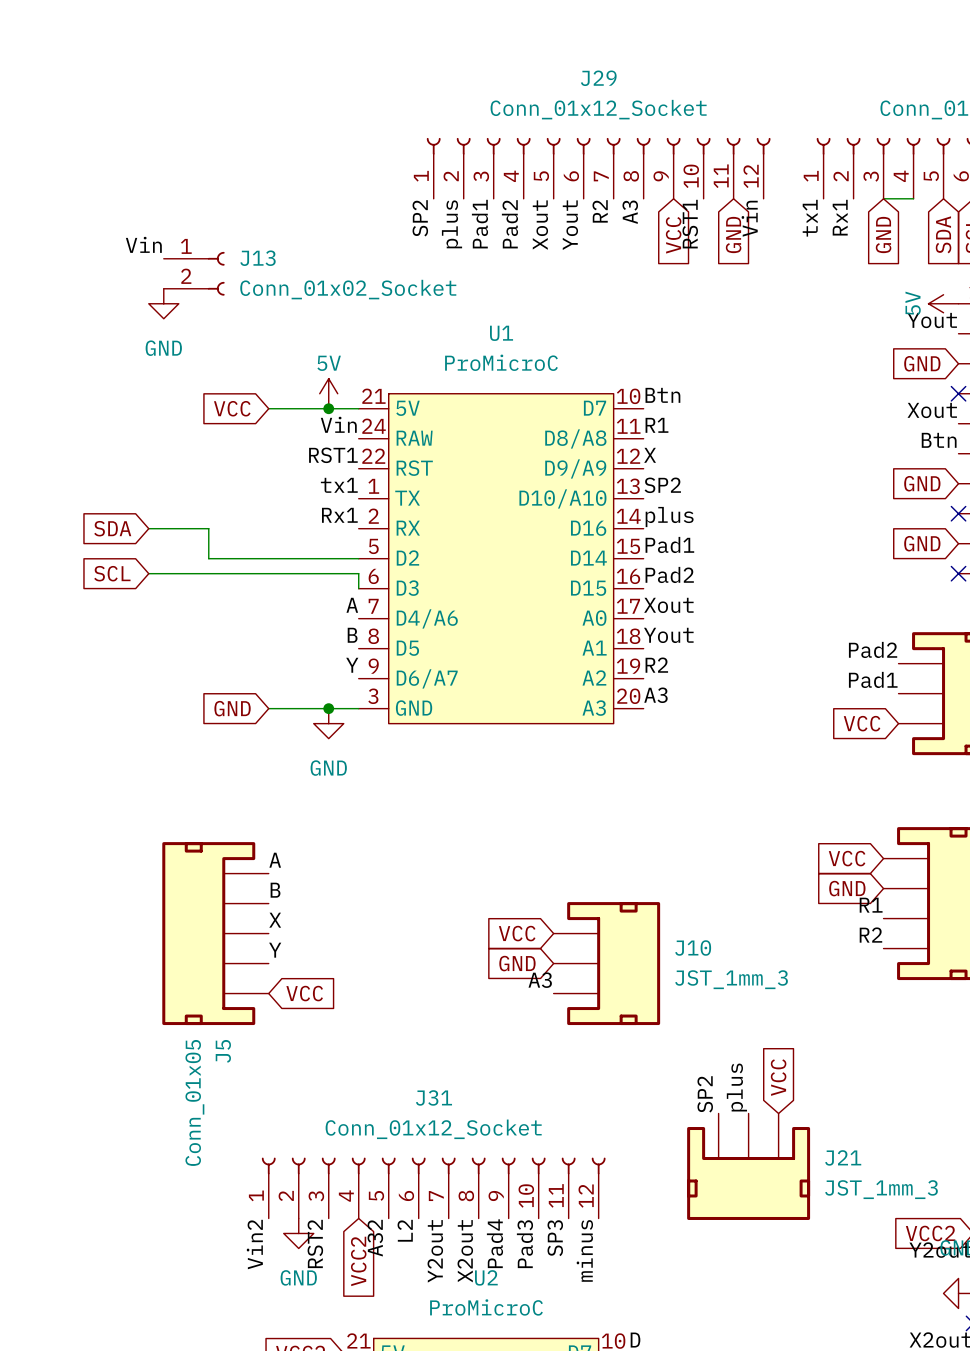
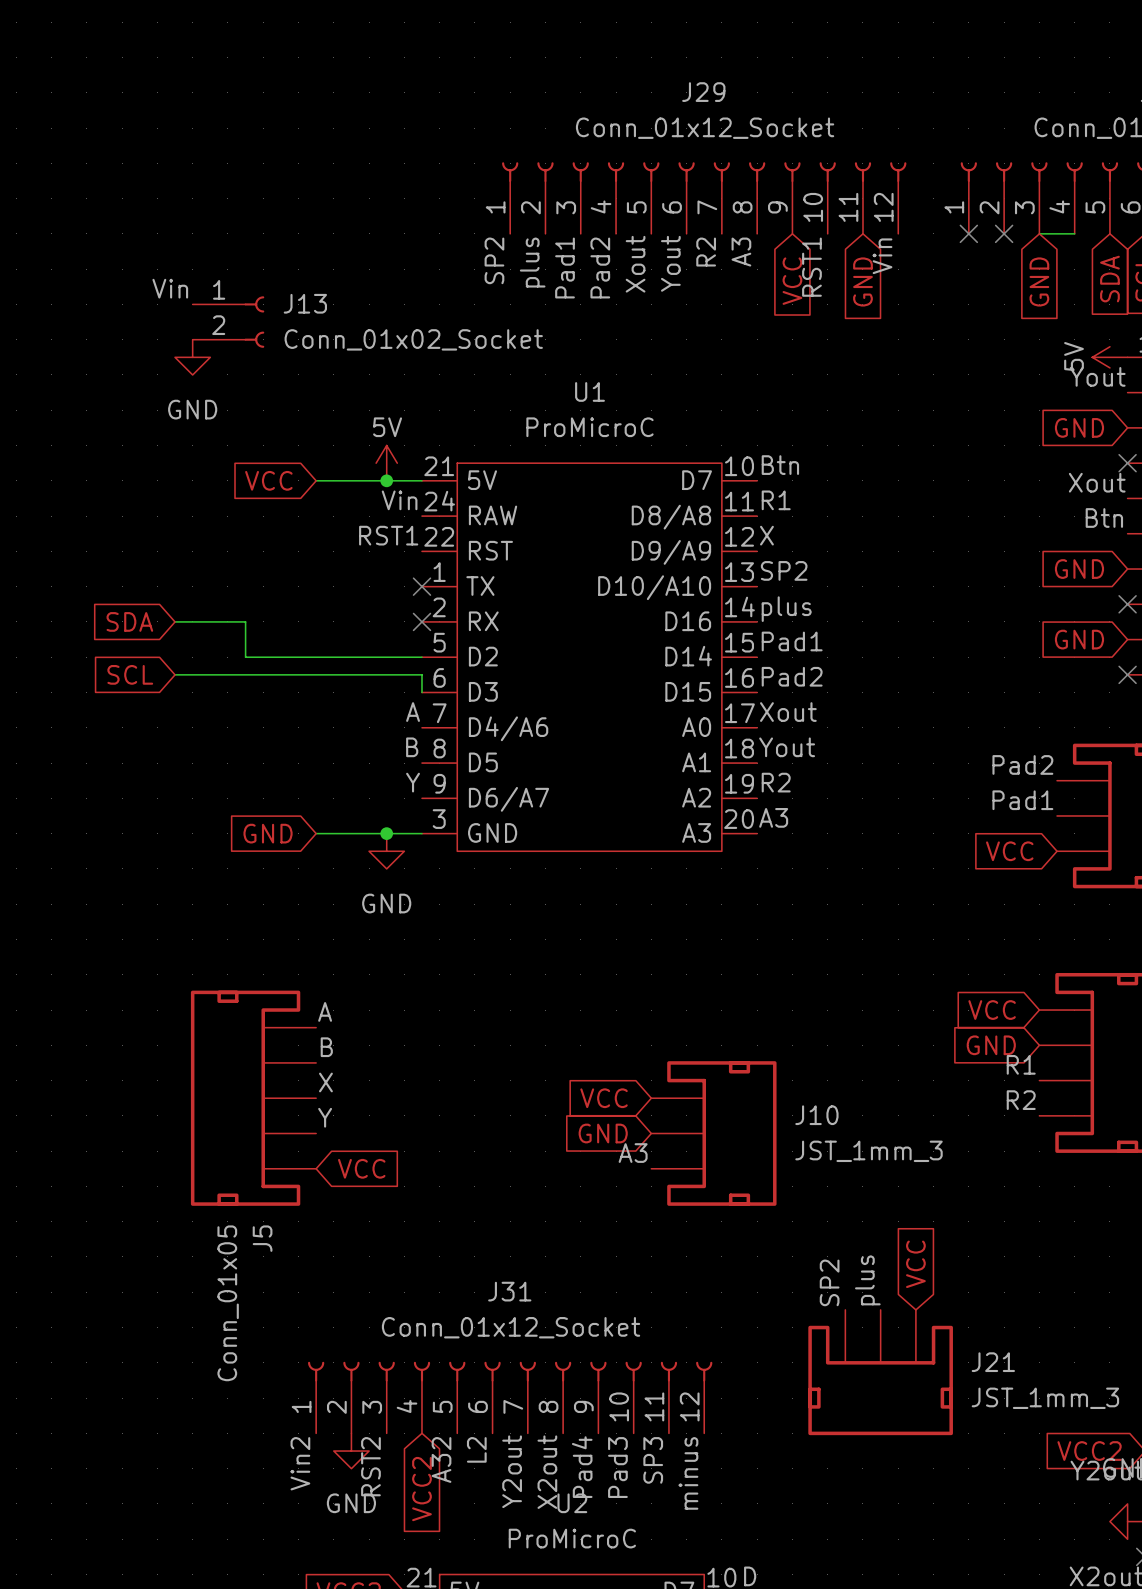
no-connect mark: none -> (968, 233)
no-connect mark: none -> (1004, 233)
label: Rx1 (840, 217) -> none
label: tx1 (810, 218) -> none
label: tx1 (339, 485) -> none
no-connect mark: none -> (421, 586)
label: Rx1 (339, 515) -> none
no-connect mark: none -> (421, 621)

